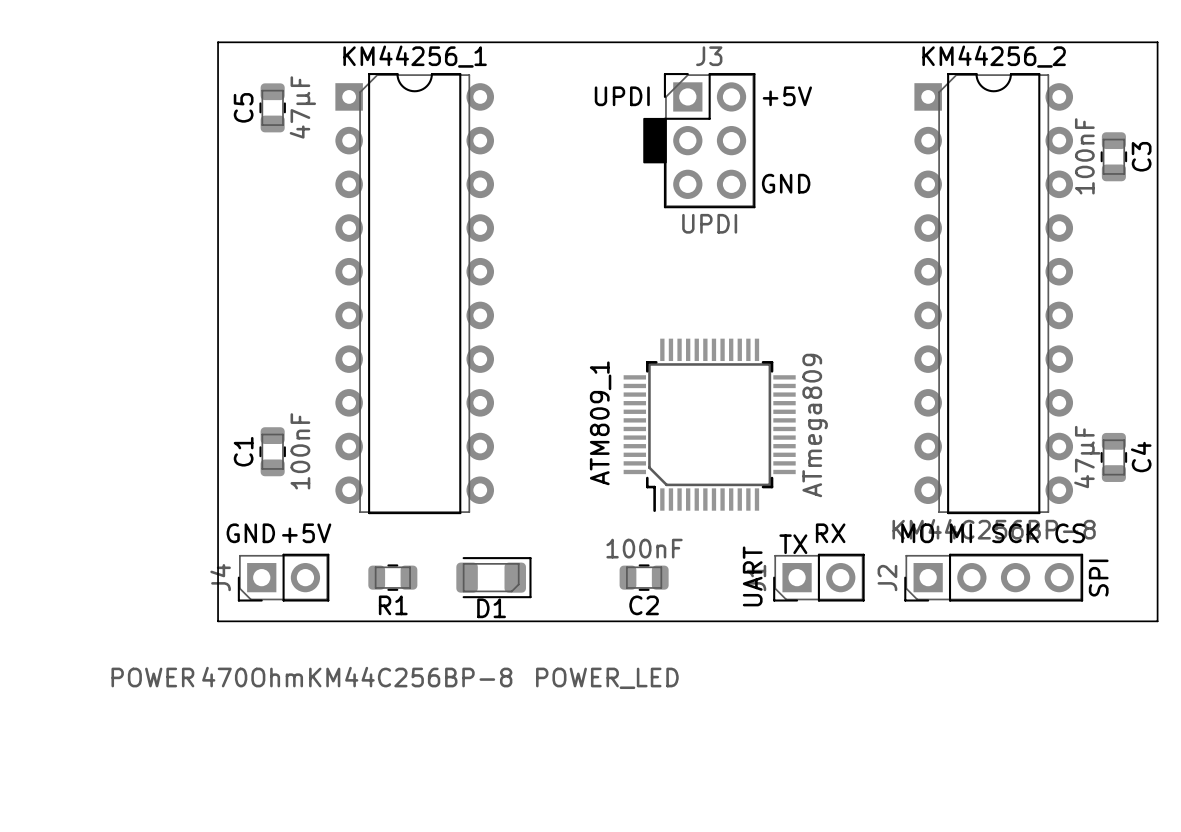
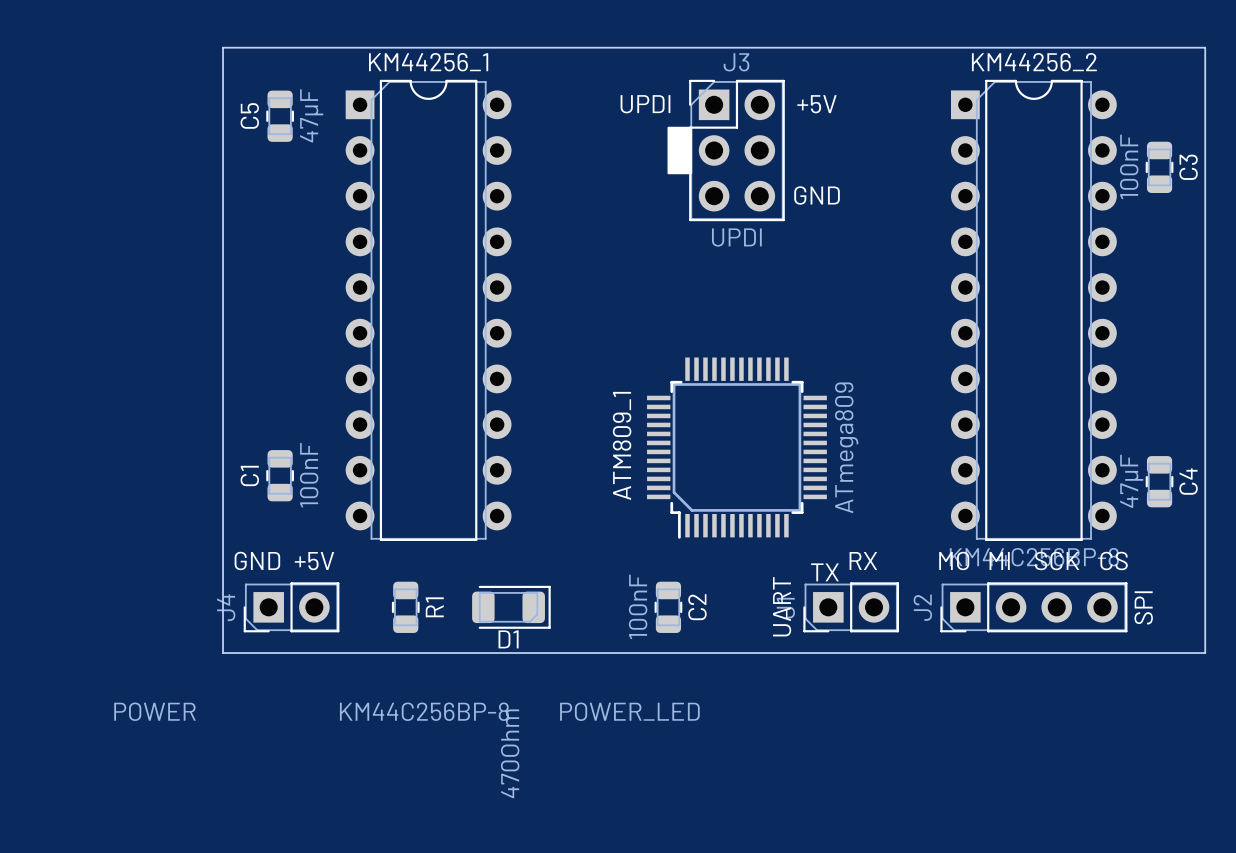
C2 value position: 100nF (644, 548) -> 100nF (638, 606)
R1 rotation: 0° (392, 577) -> 90° clockwise (405, 607)
C2 rotation: 0° (644, 577) -> 90° clockwise (668, 607)
R1 name position: R1 (393, 605) -> R1 (434, 607)
C2 name position: C2 (644, 605) -> C2 (697, 607)
R1 value position: 470Ohm (252, 677) -> 470Ohm (510, 753)

